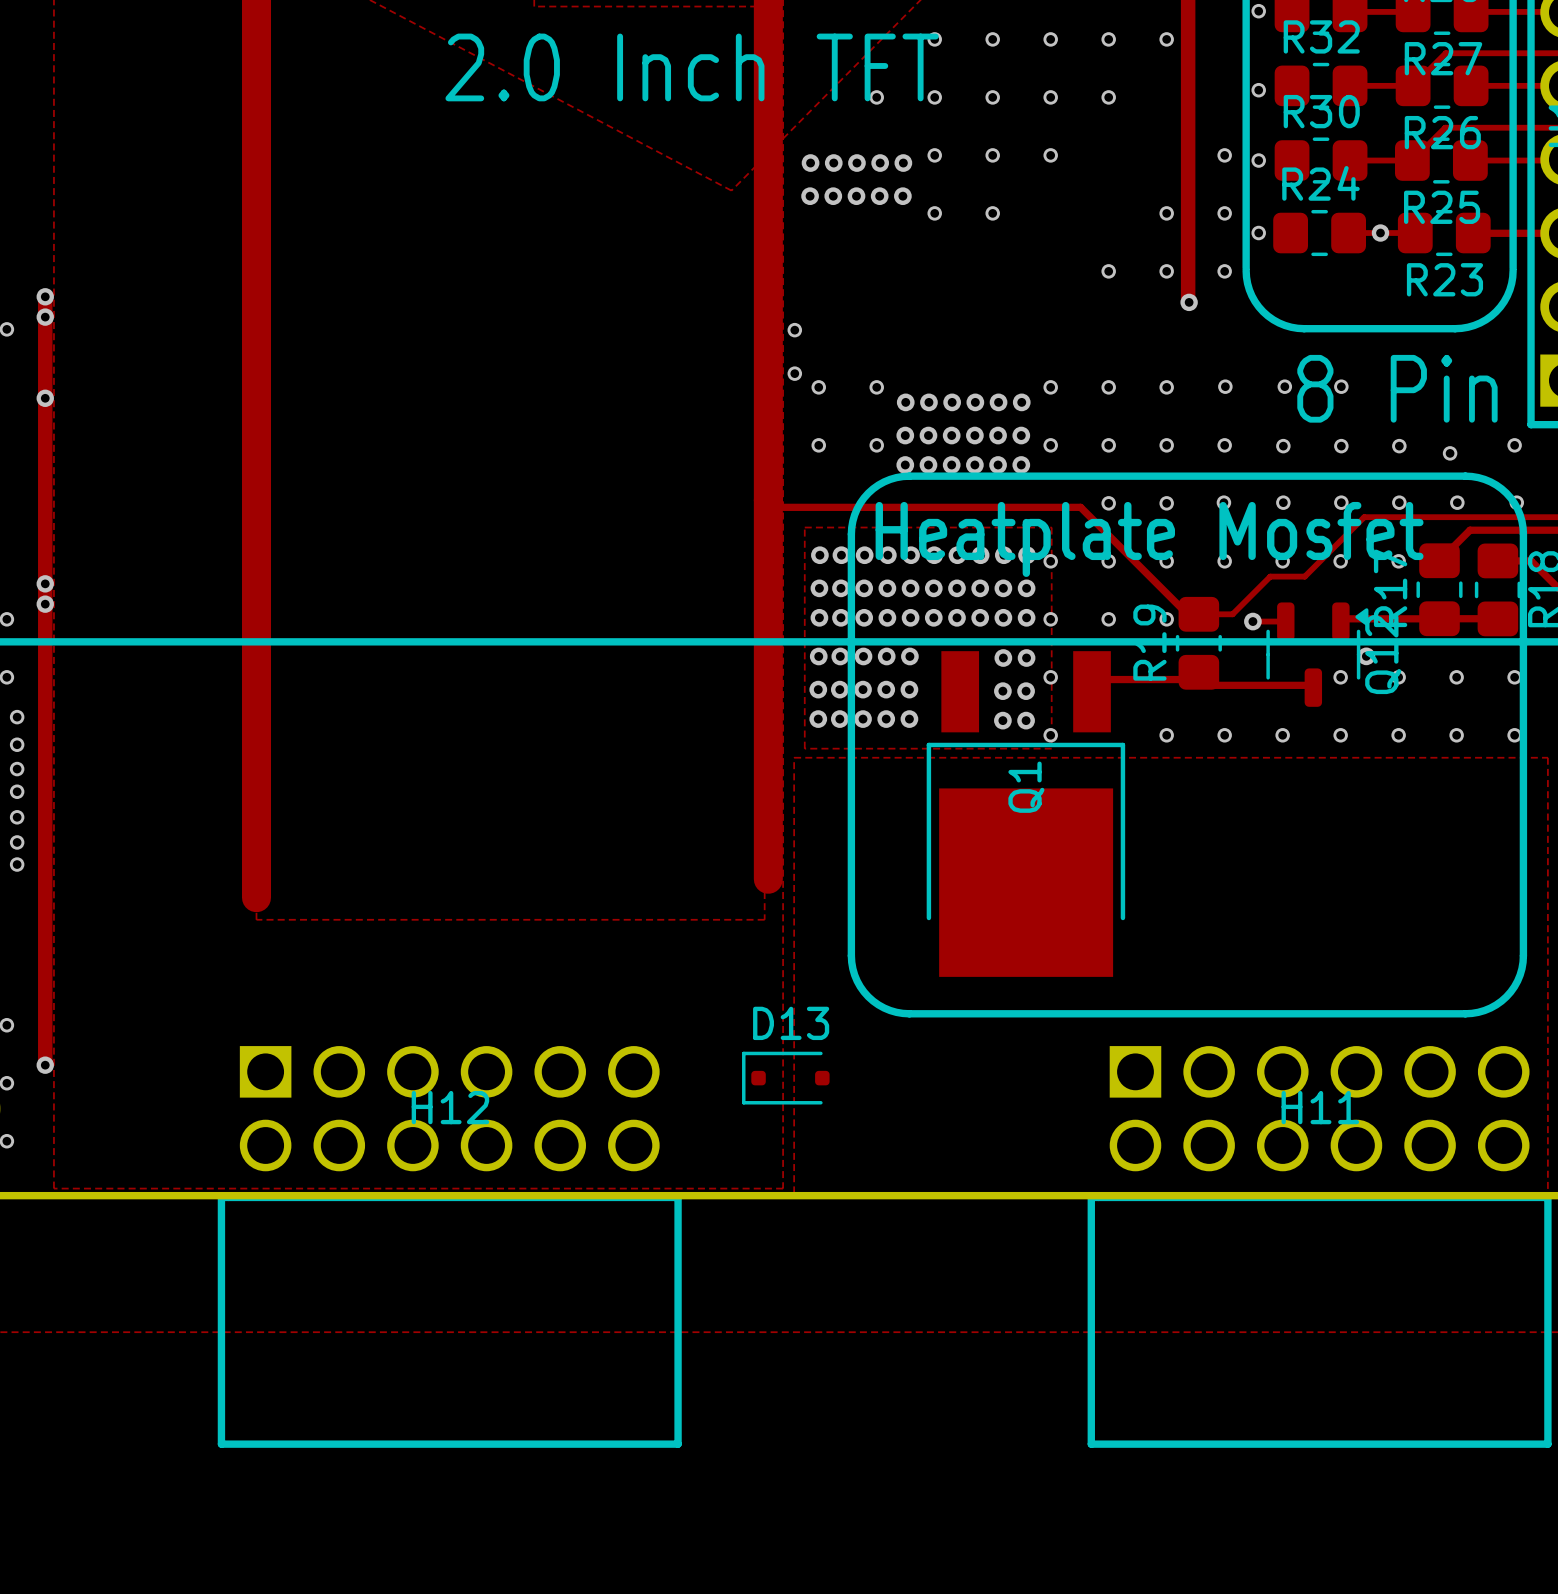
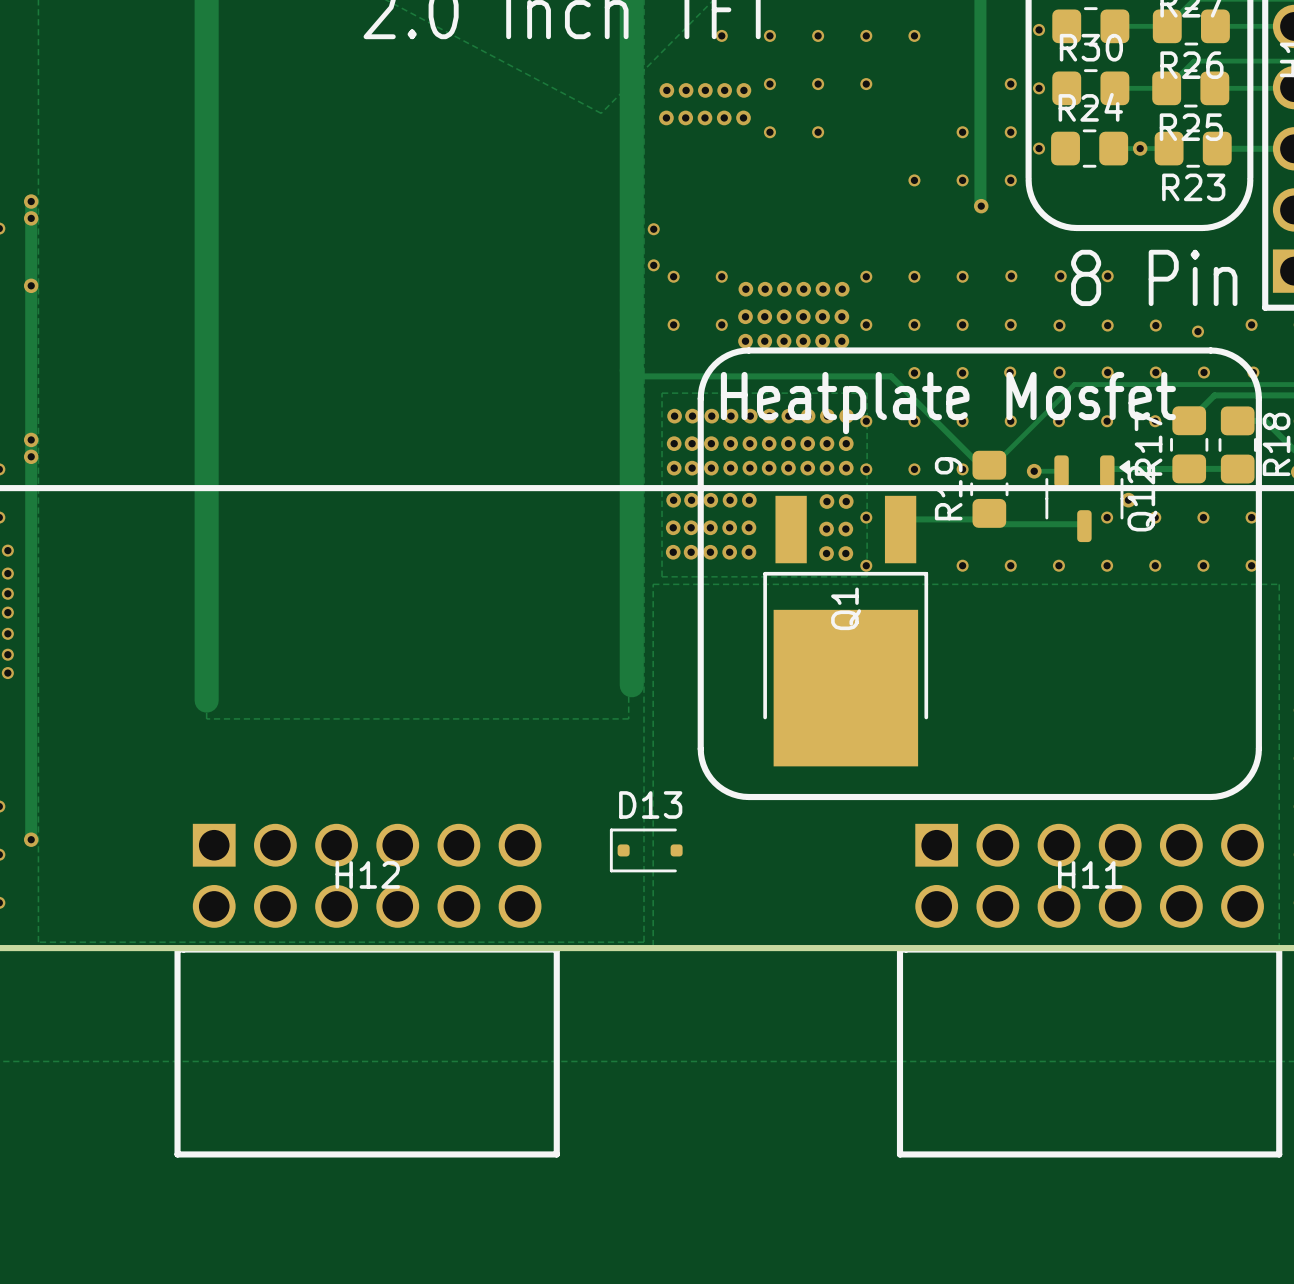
track: (1364, 517) (1304, 576) (1270, 576) (1232, 614) (1204, 614) -> (1126, 384) (1074, 384) (993, 465)

